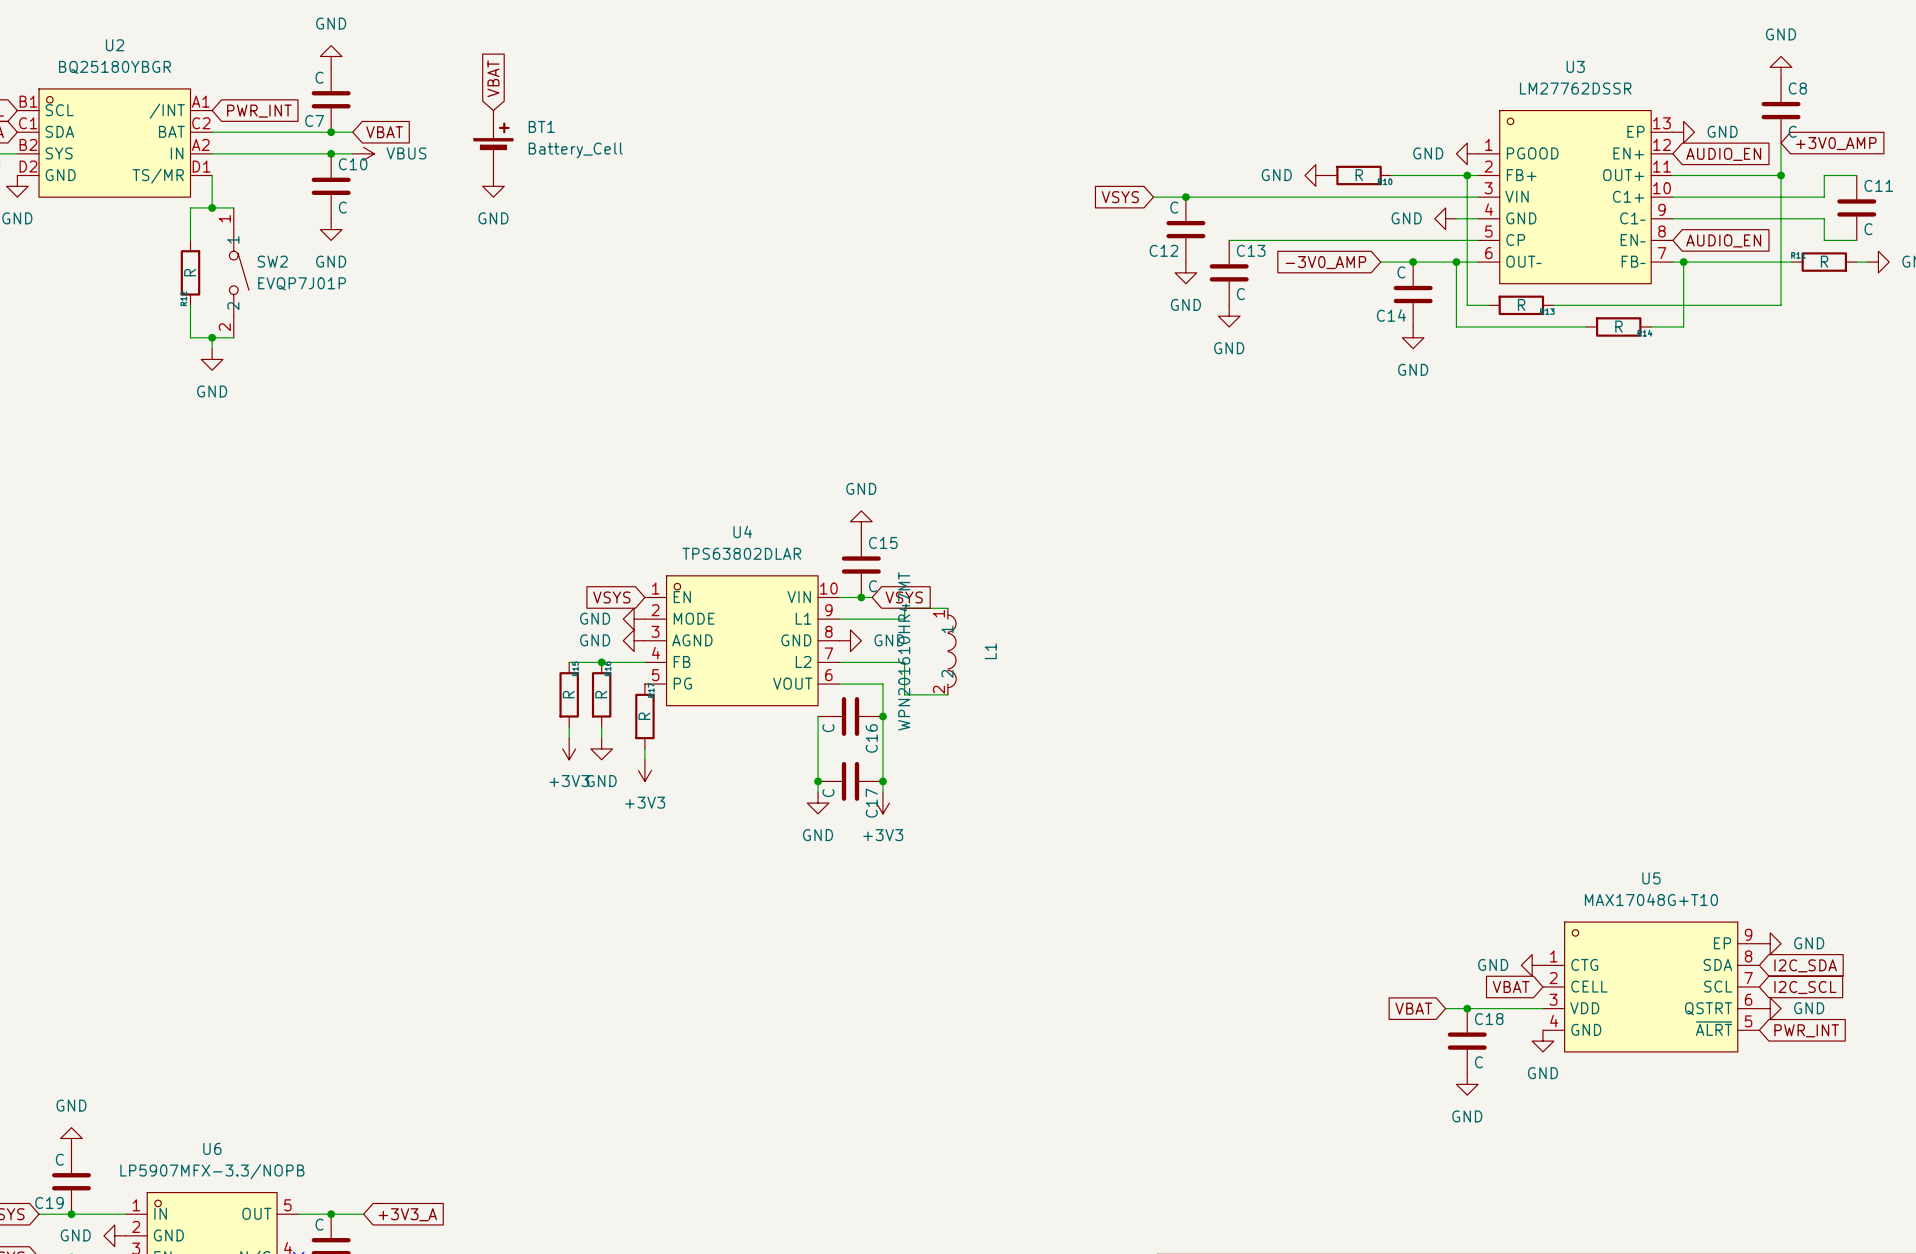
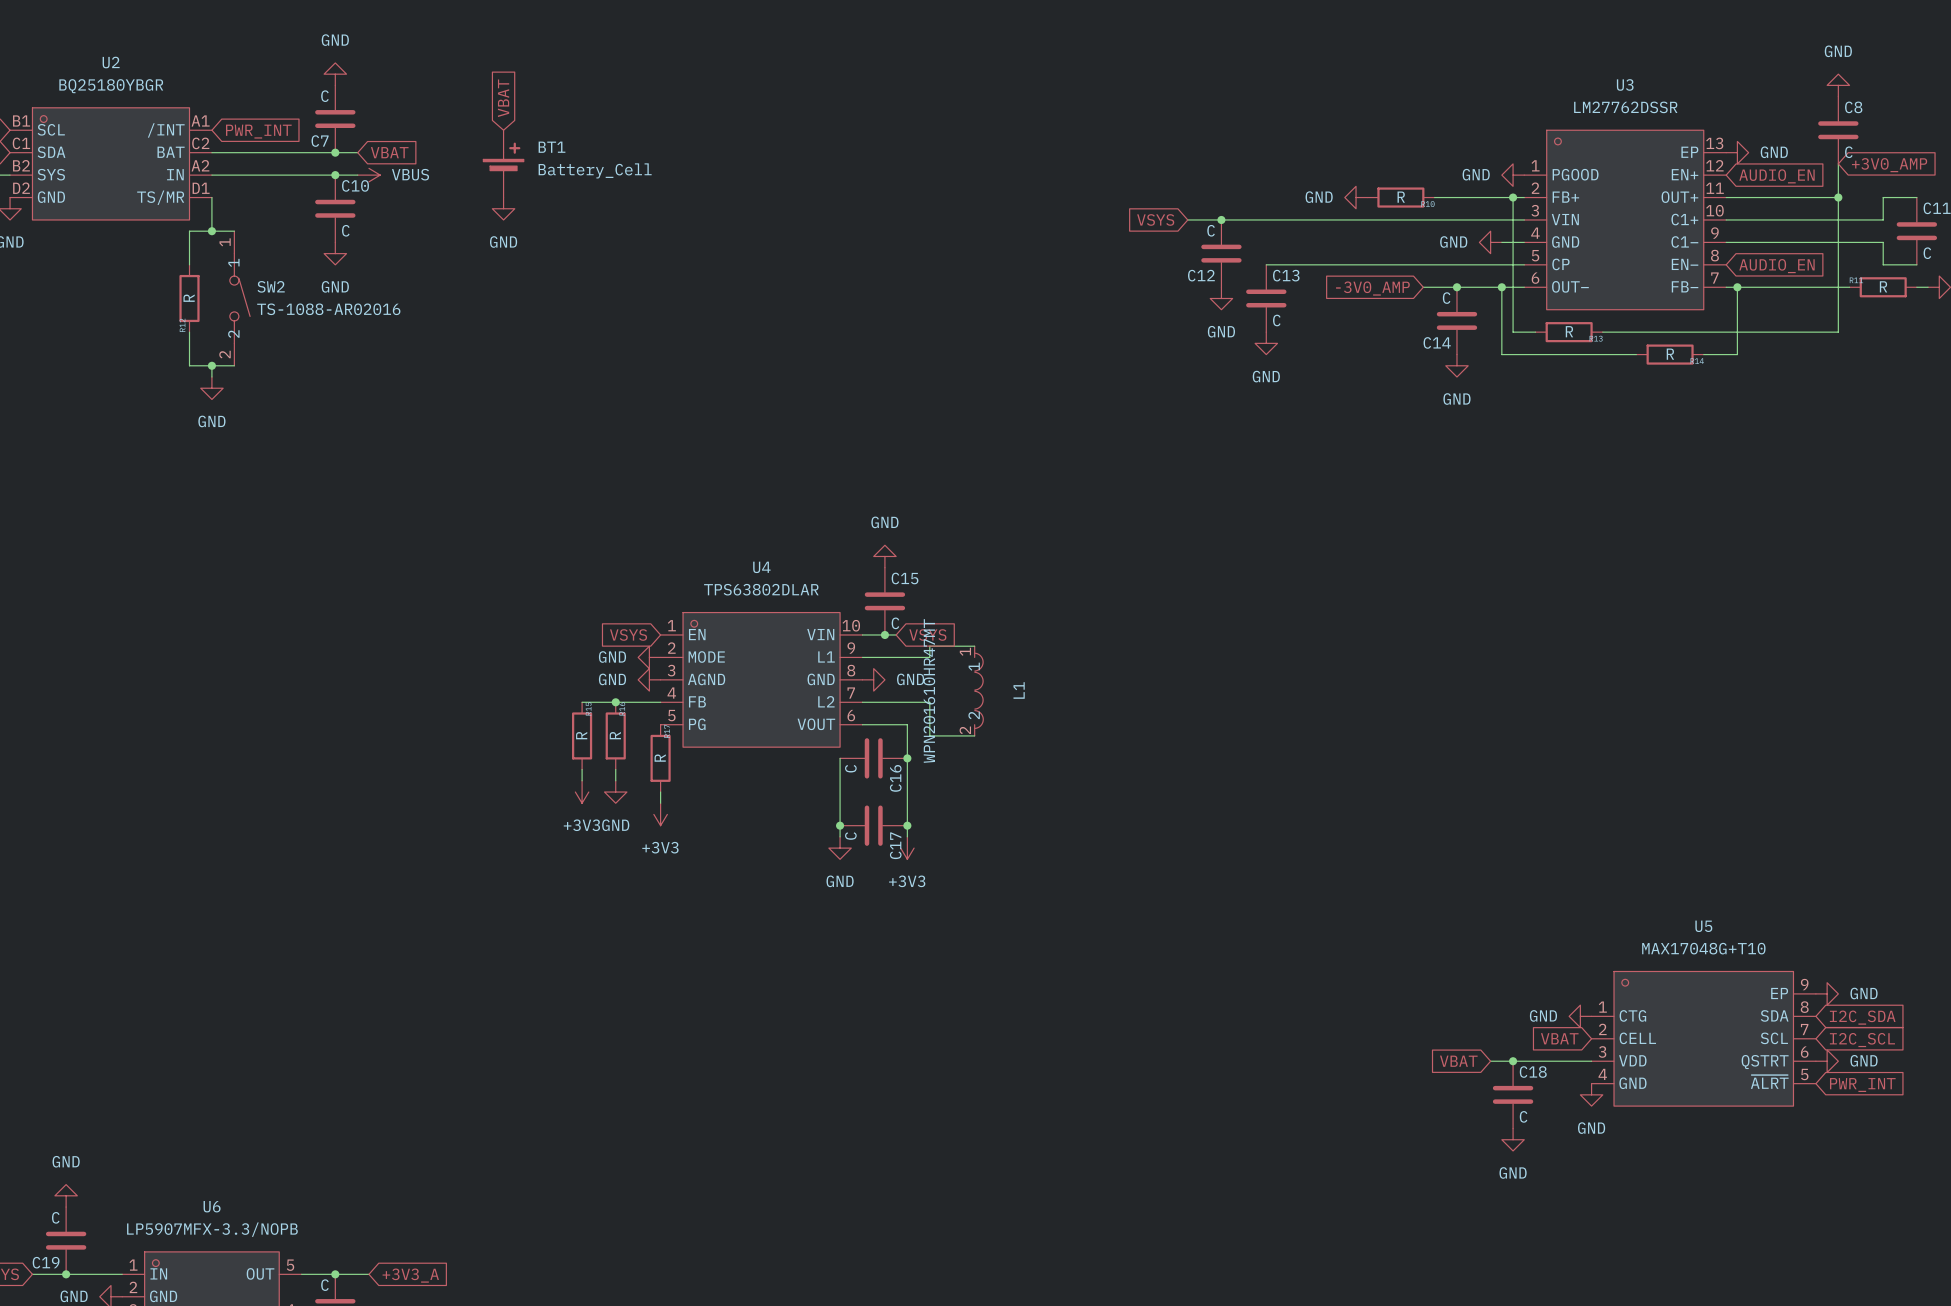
SW2 value: EVQP7J01P (302, 283) -> TS-1088-AR02016 (328, 309)

